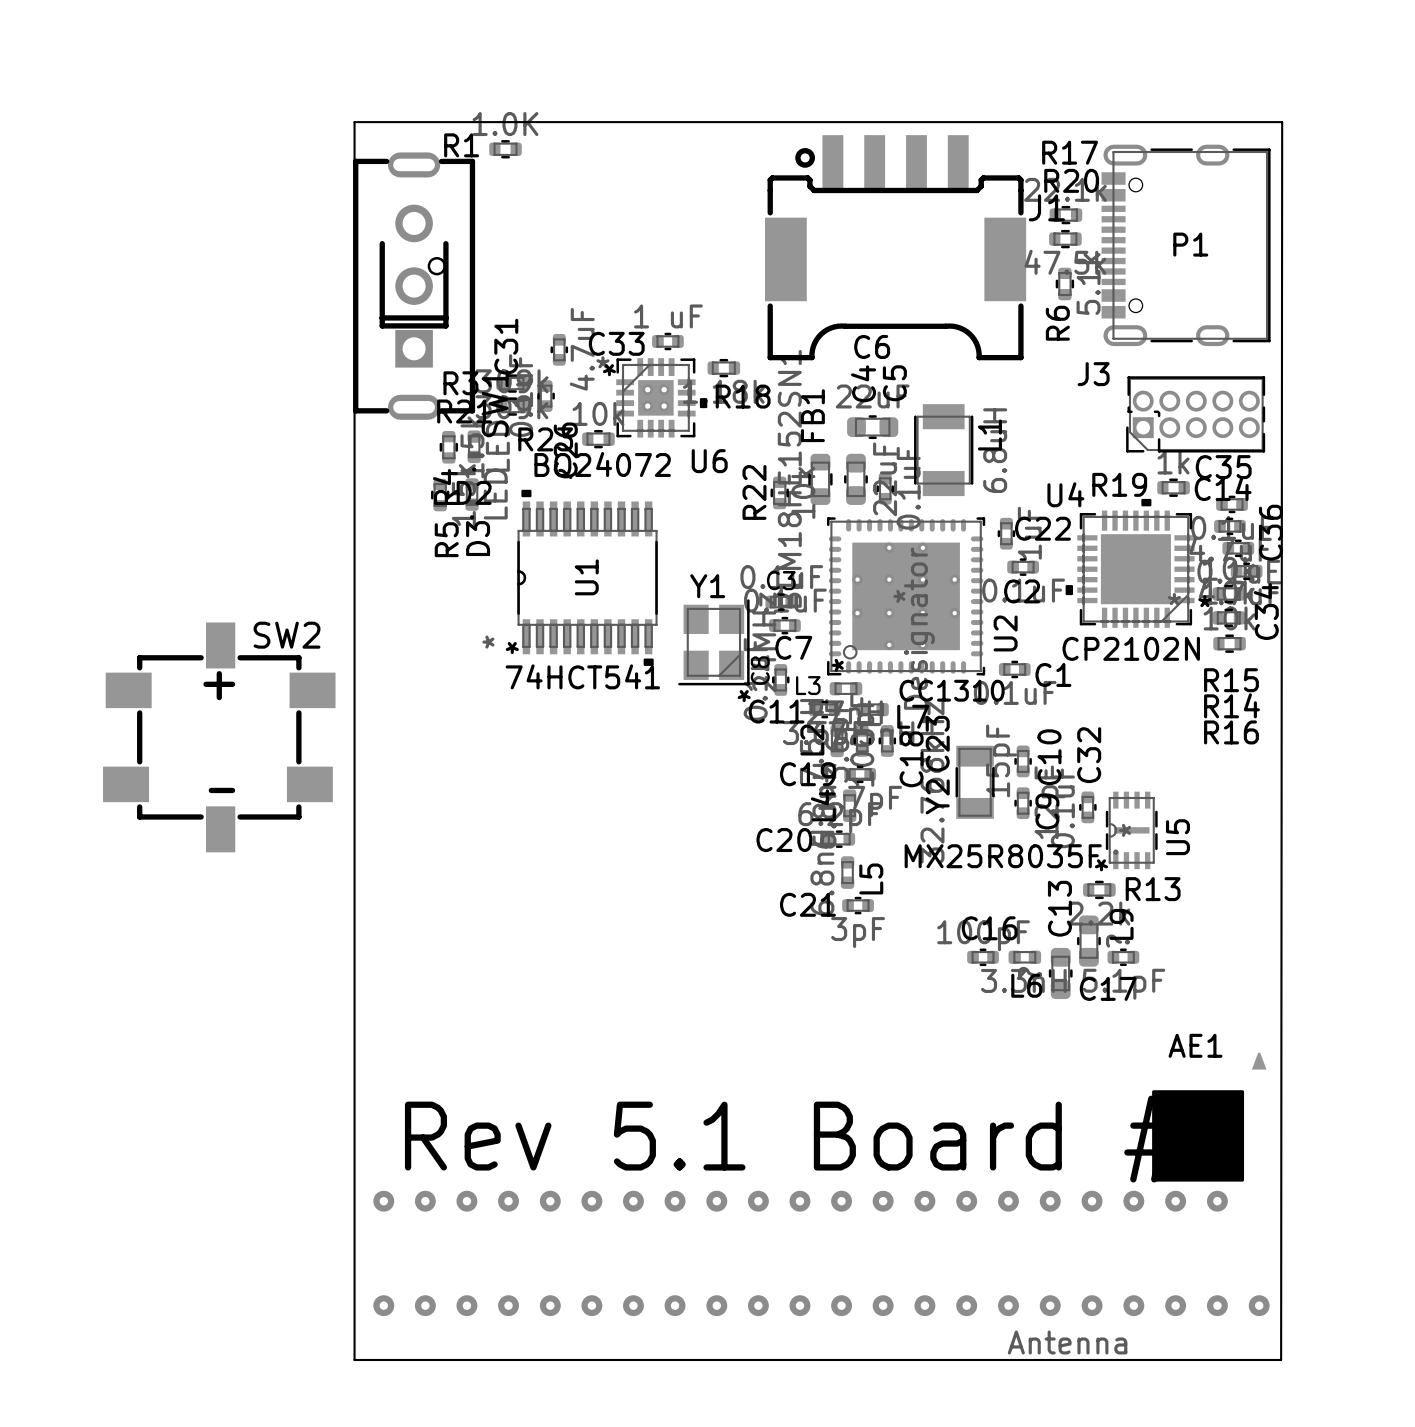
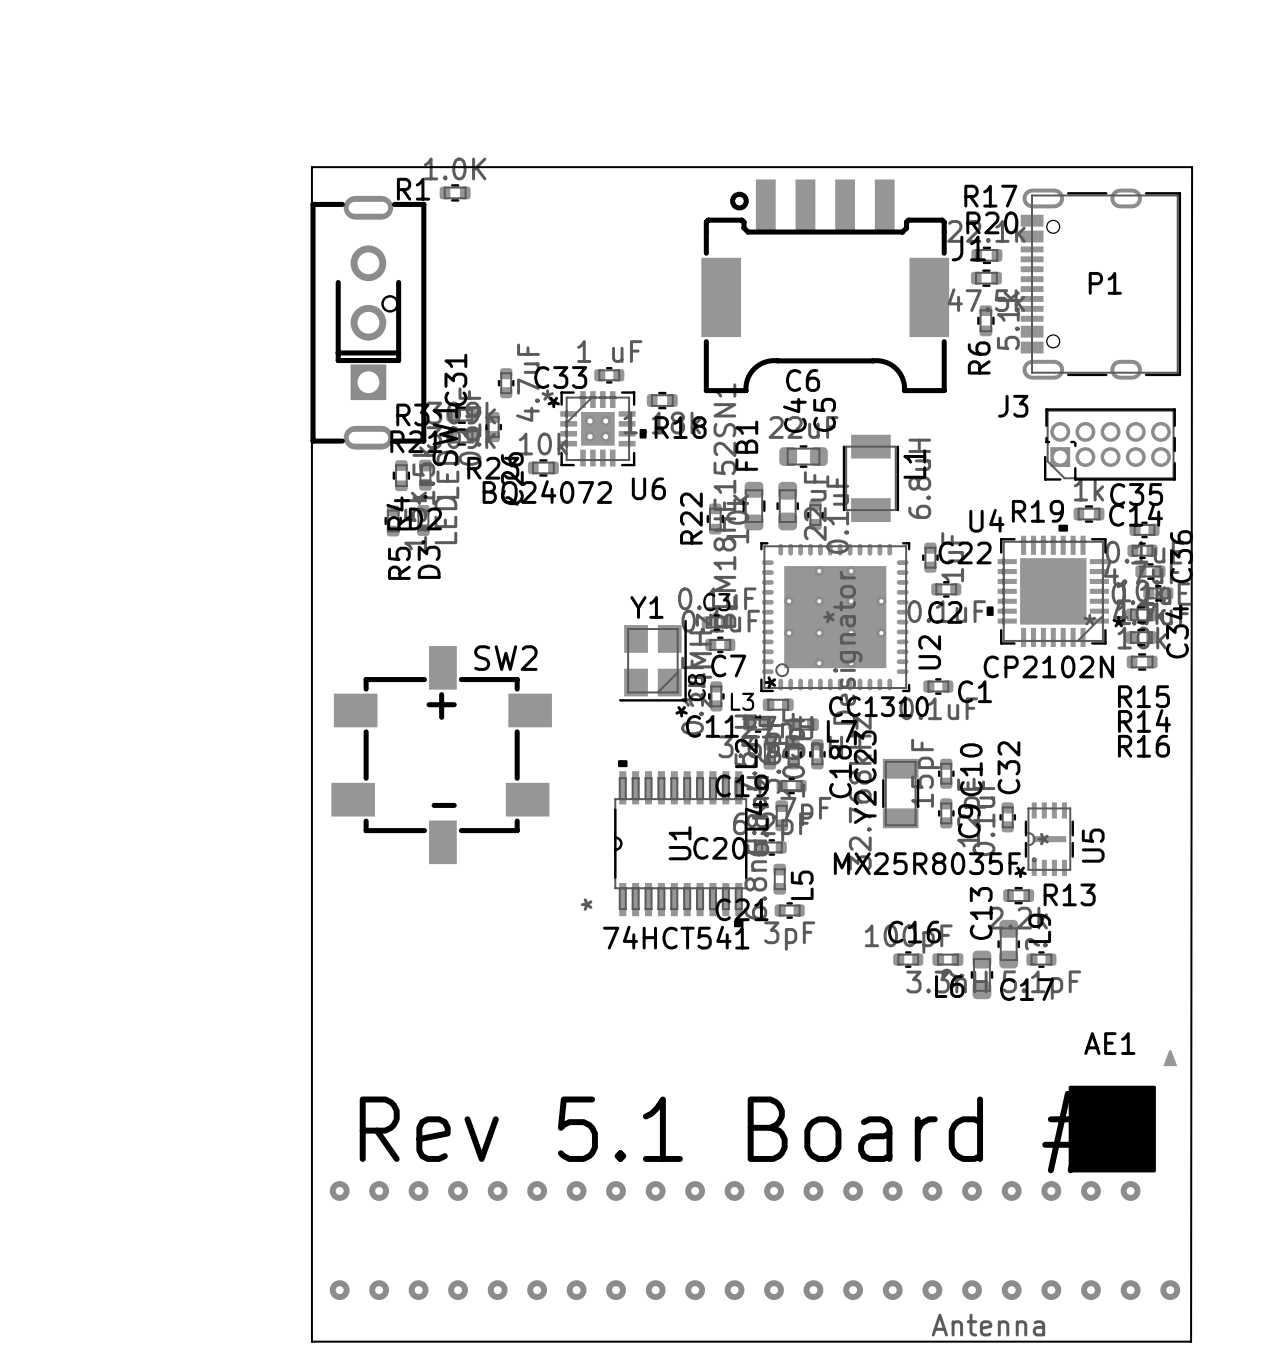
U1 position: (587, 577) -> (680, 843)
text: * (512, 648) -> none
SW2 position: (219, 737) -> (441, 755)

